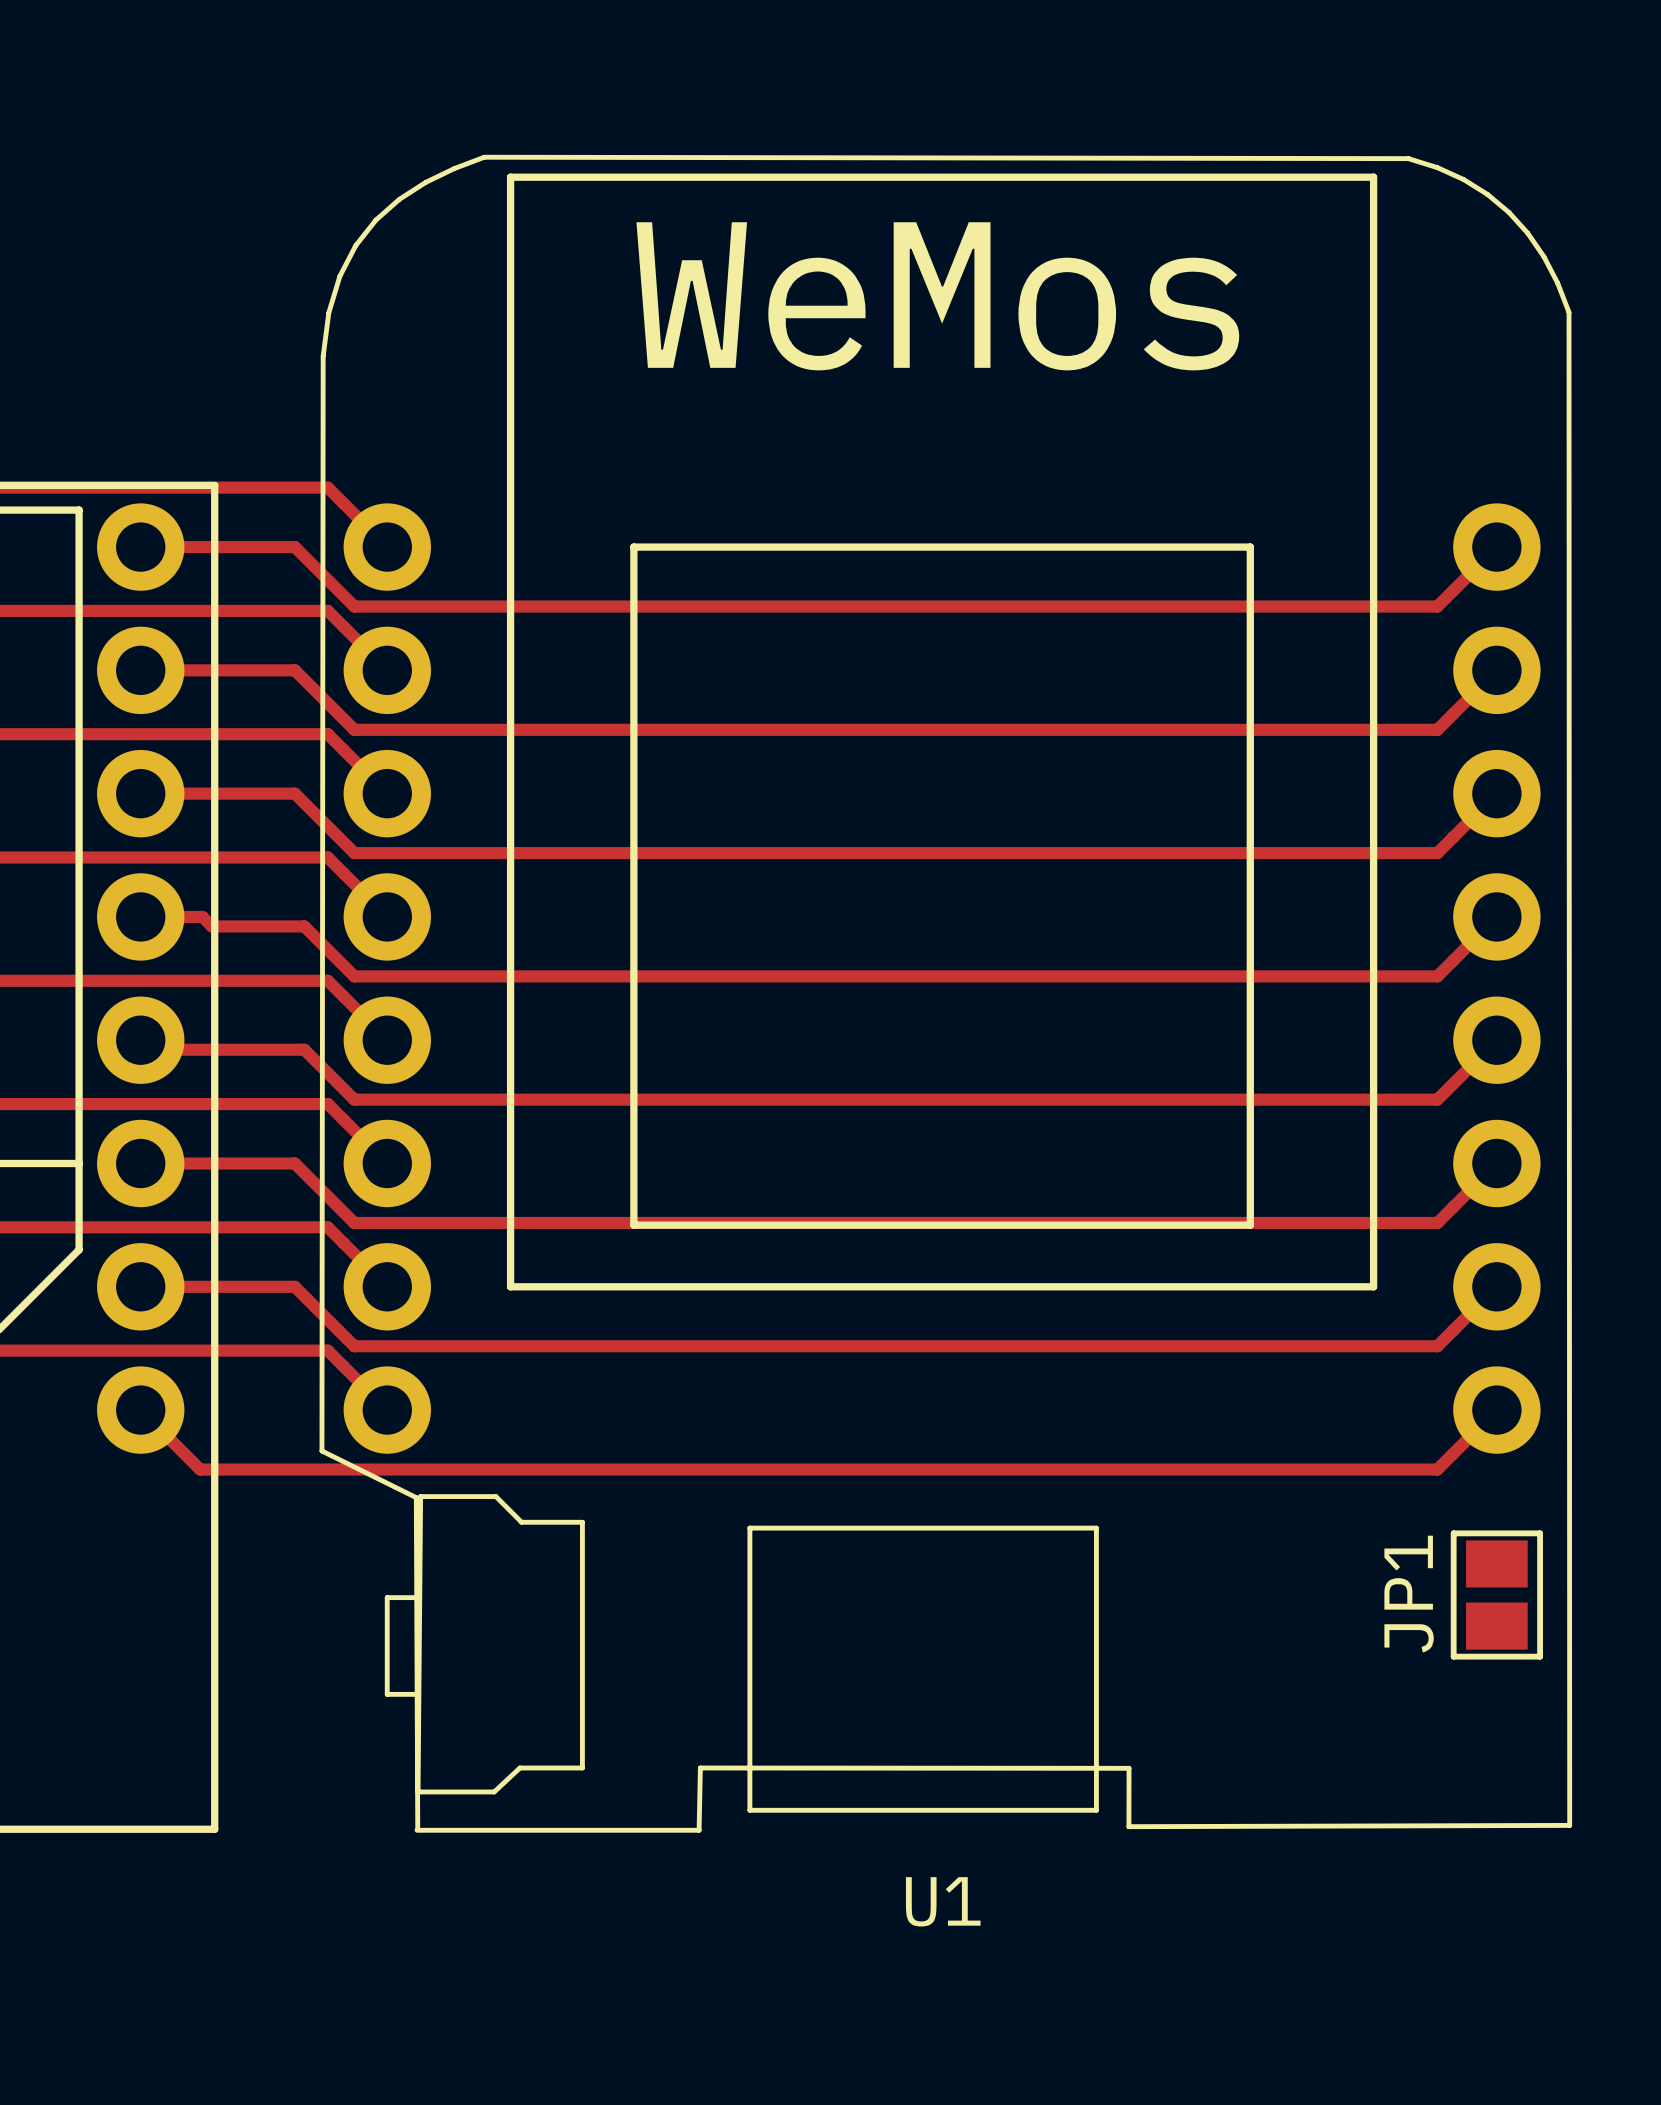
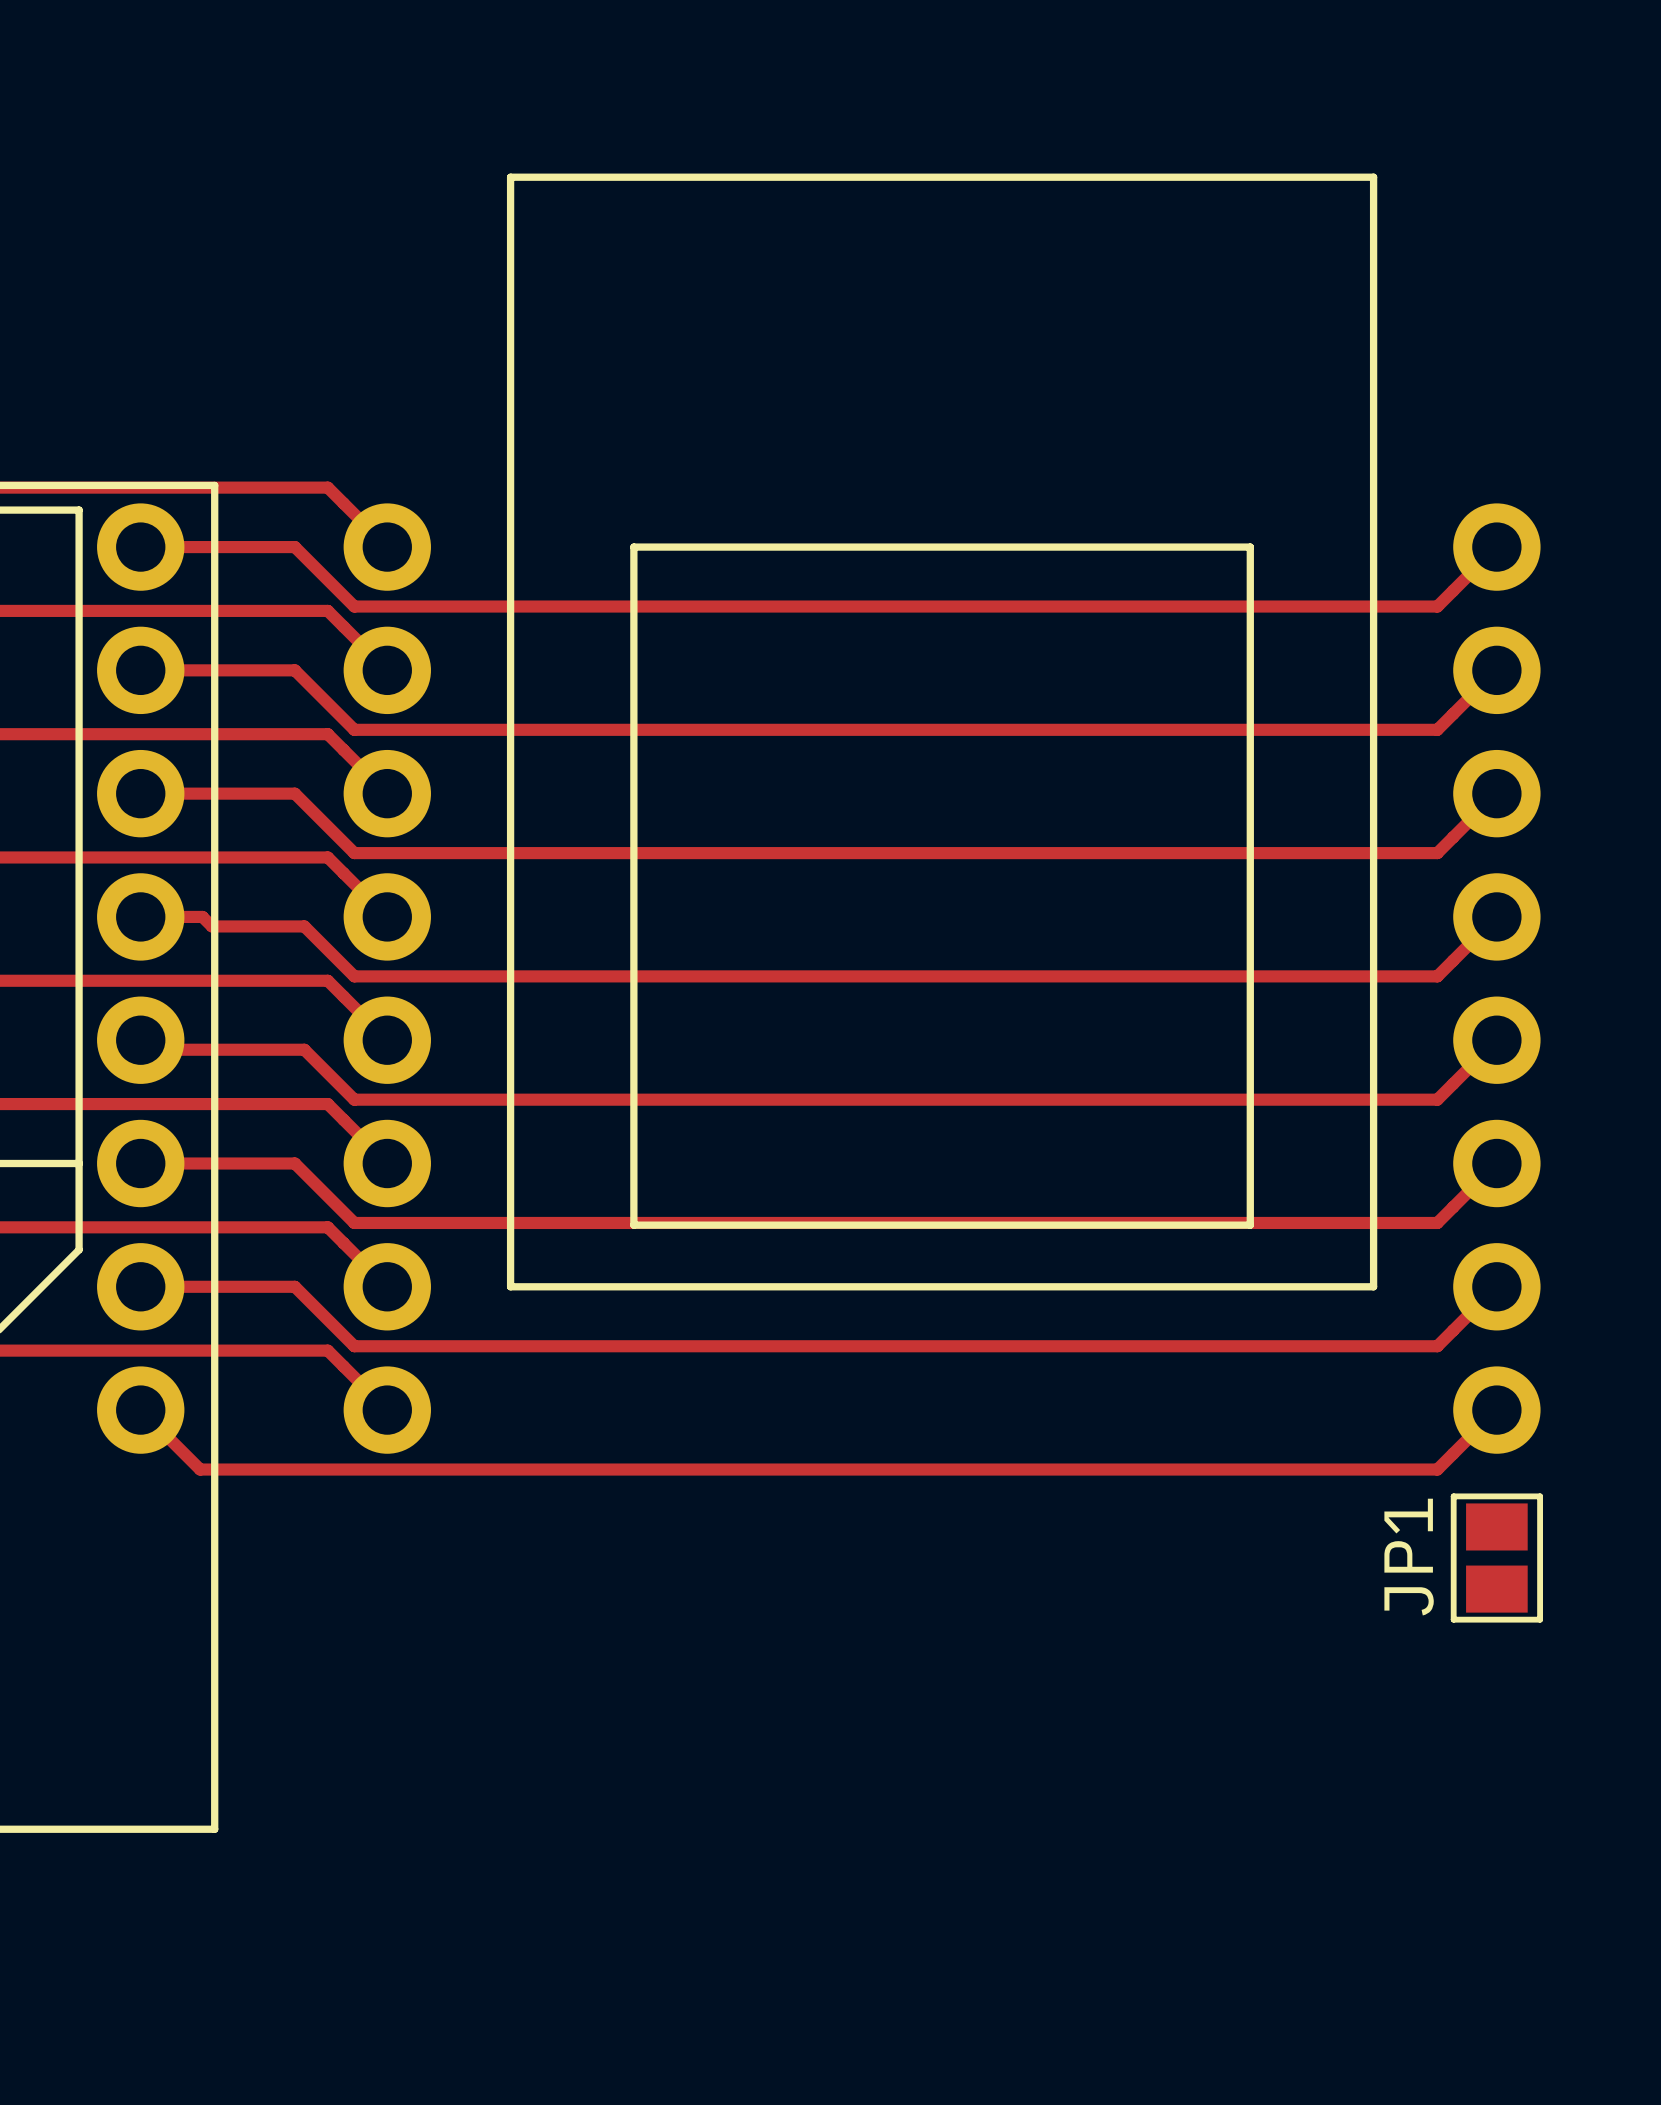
U1 side: top (945, 993) -> bottom (942, 813)
JP1 position: (1496, 1595) -> (1496, 1558)

